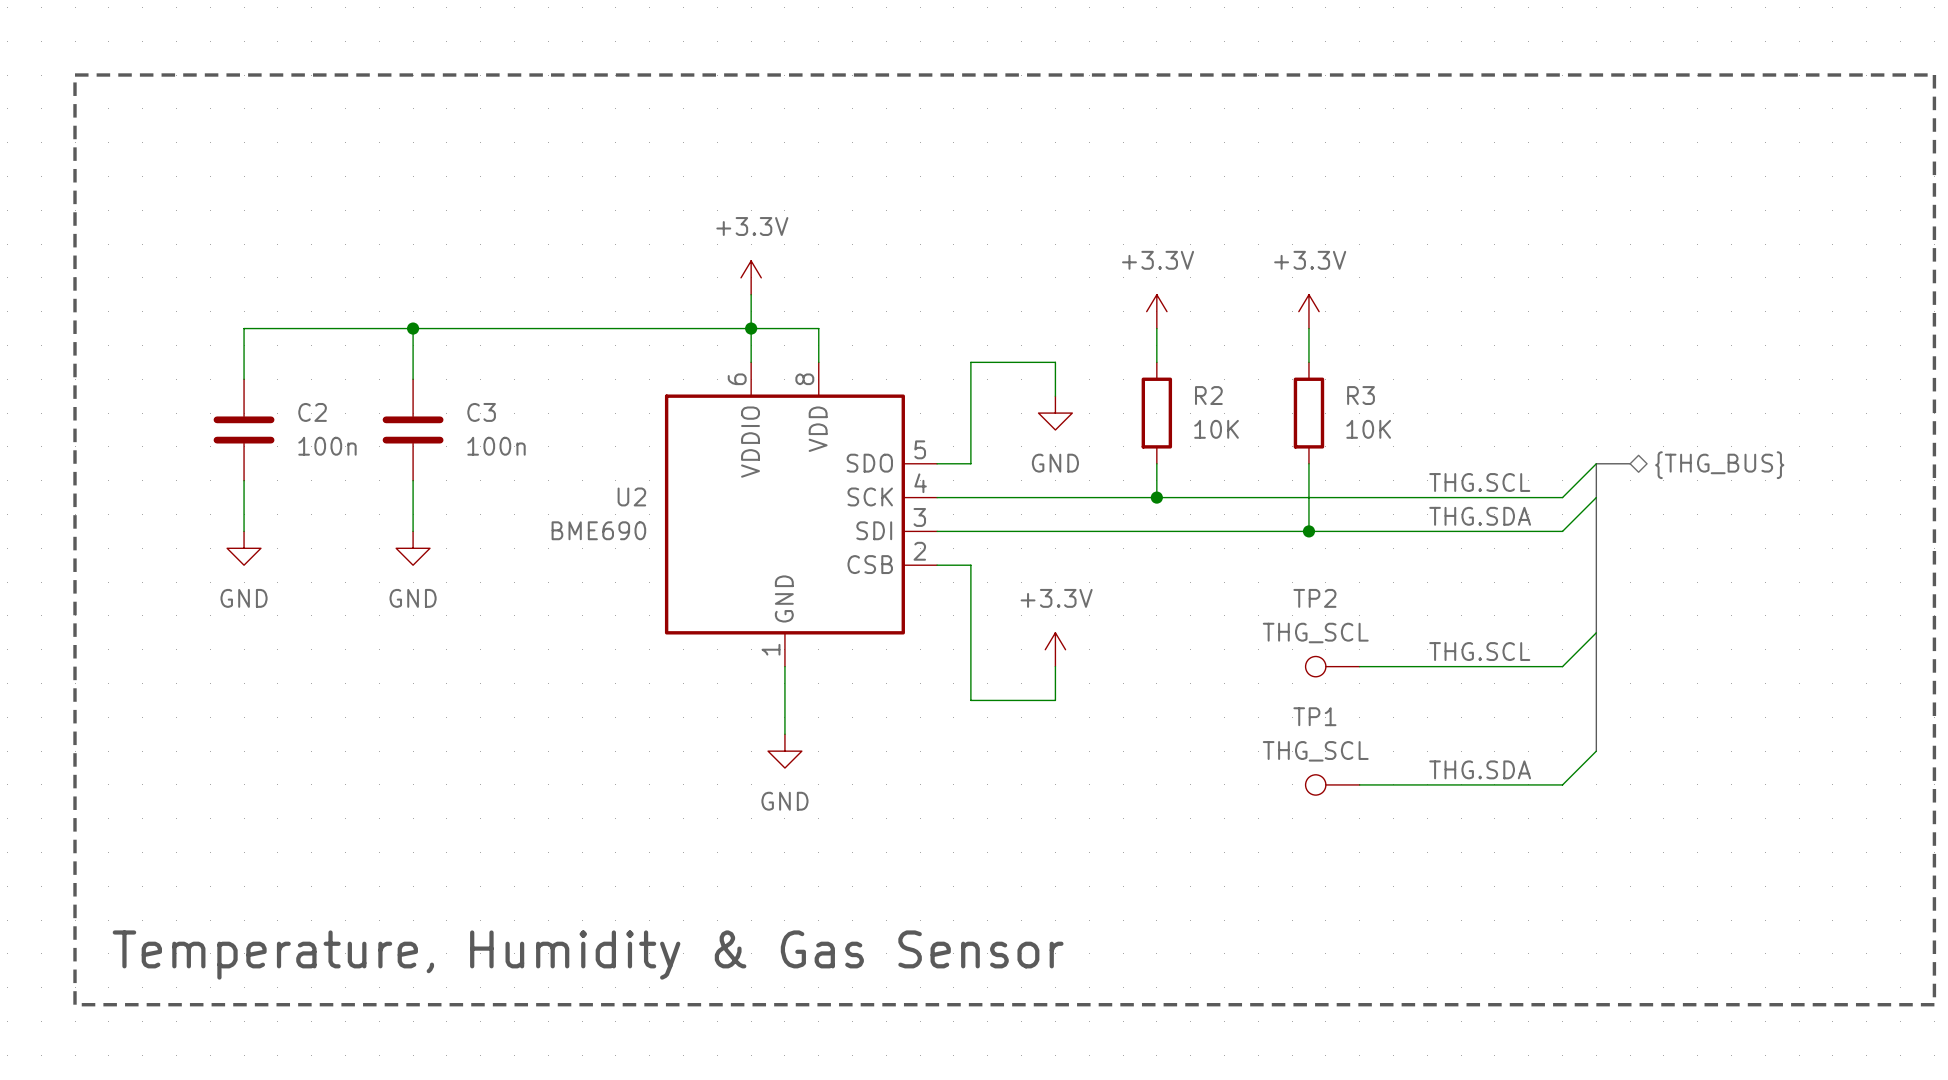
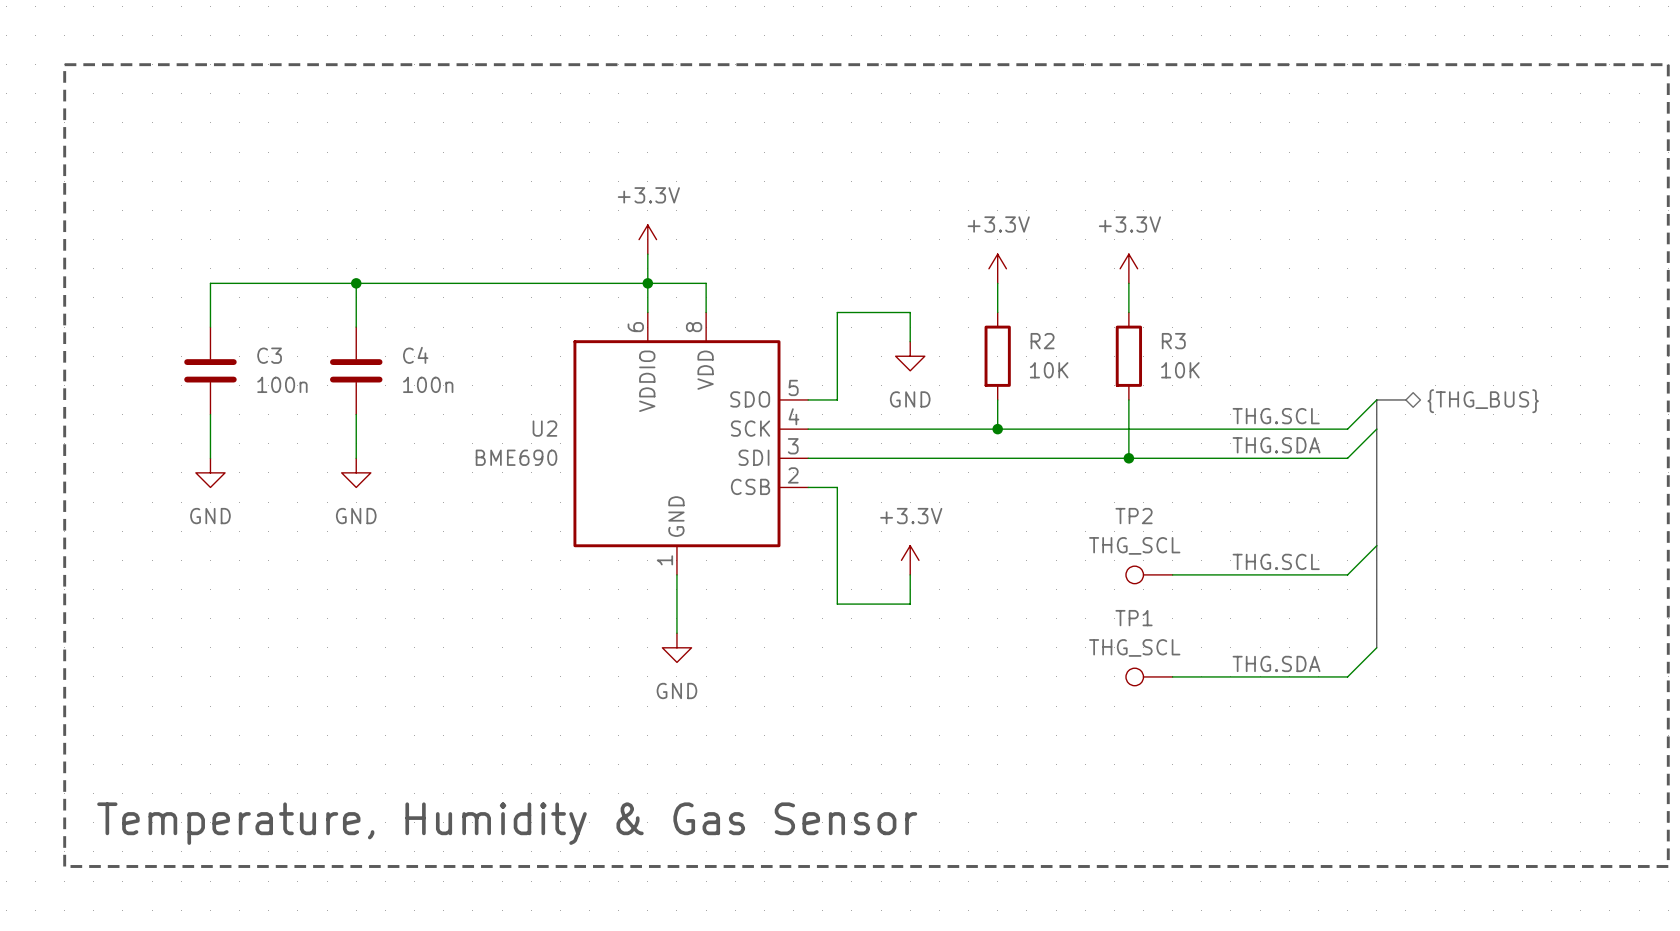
C2 name: C2 (312, 412) -> C3 (269, 355)
C3 name: C3 (481, 412) -> C4 (415, 355)

